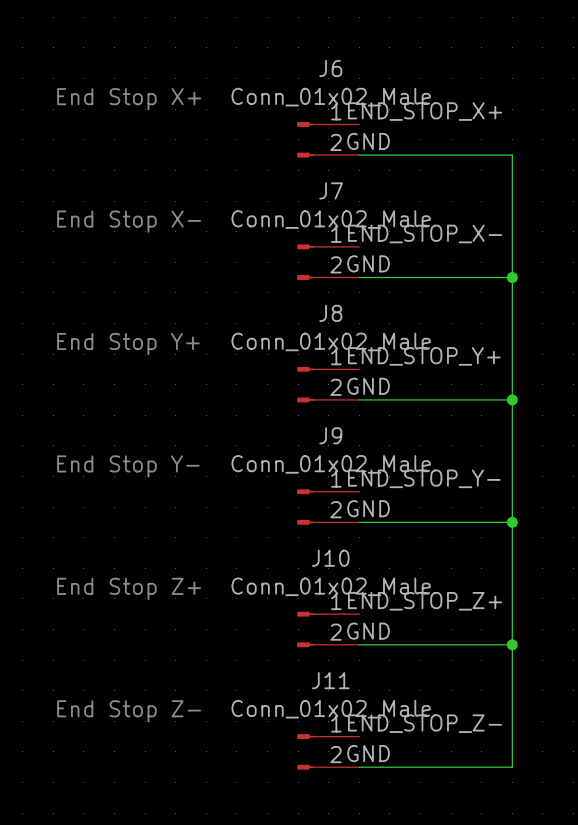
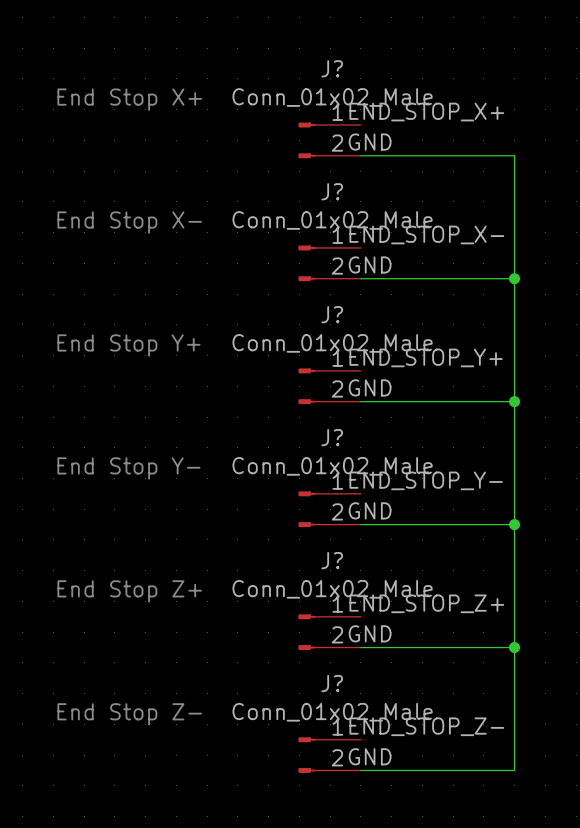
J6 name: J6 (330, 68) -> J? (332, 68)
J7 name: J7 (331, 190) -> J? (332, 191)
J8 name: J8 (330, 313) -> J? (332, 314)
J9 name: J9 (330, 435) -> J? (332, 437)
J10 name: J10 (330, 558) -> J? (332, 560)
J11 name: J11 (330, 680) -> J? (332, 683)

